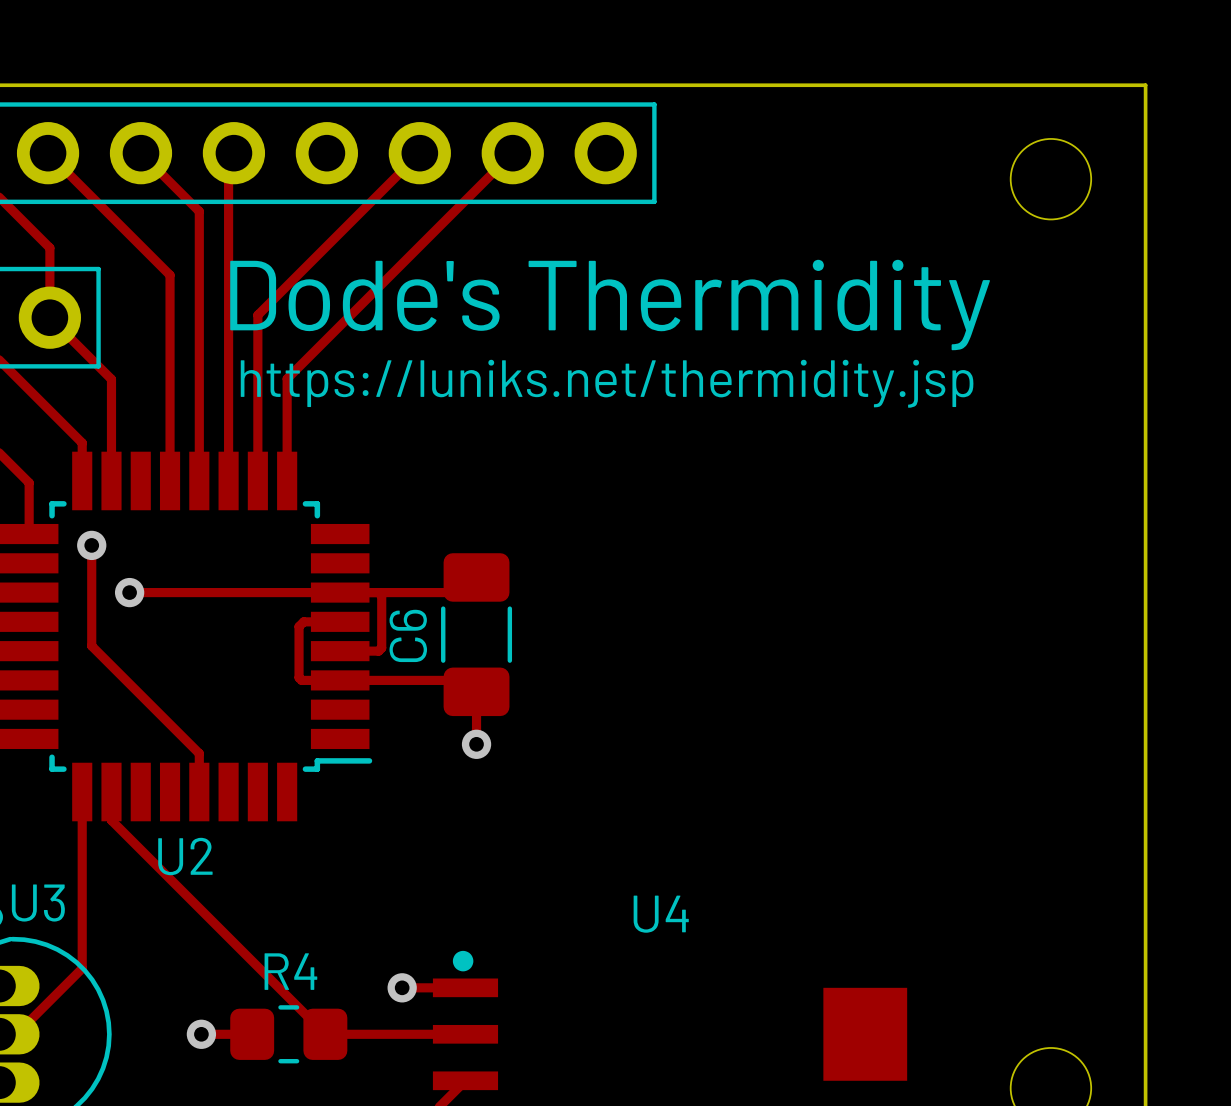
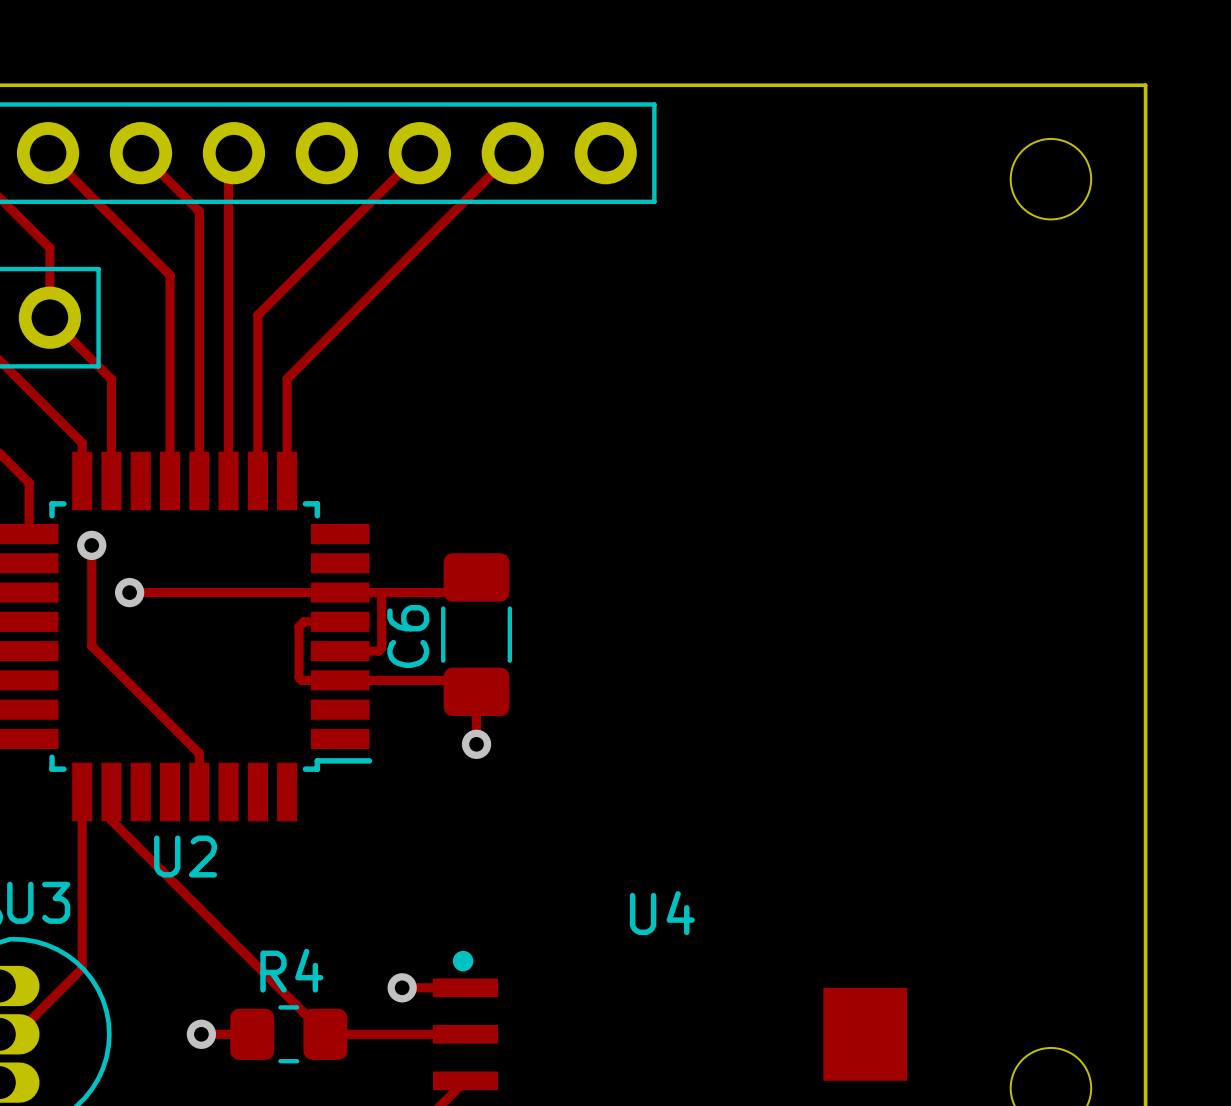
text: Dode's Thermidity (610, 305) -> none
text: https://luniks.net/thermidity.jsp (607, 383) -> none

